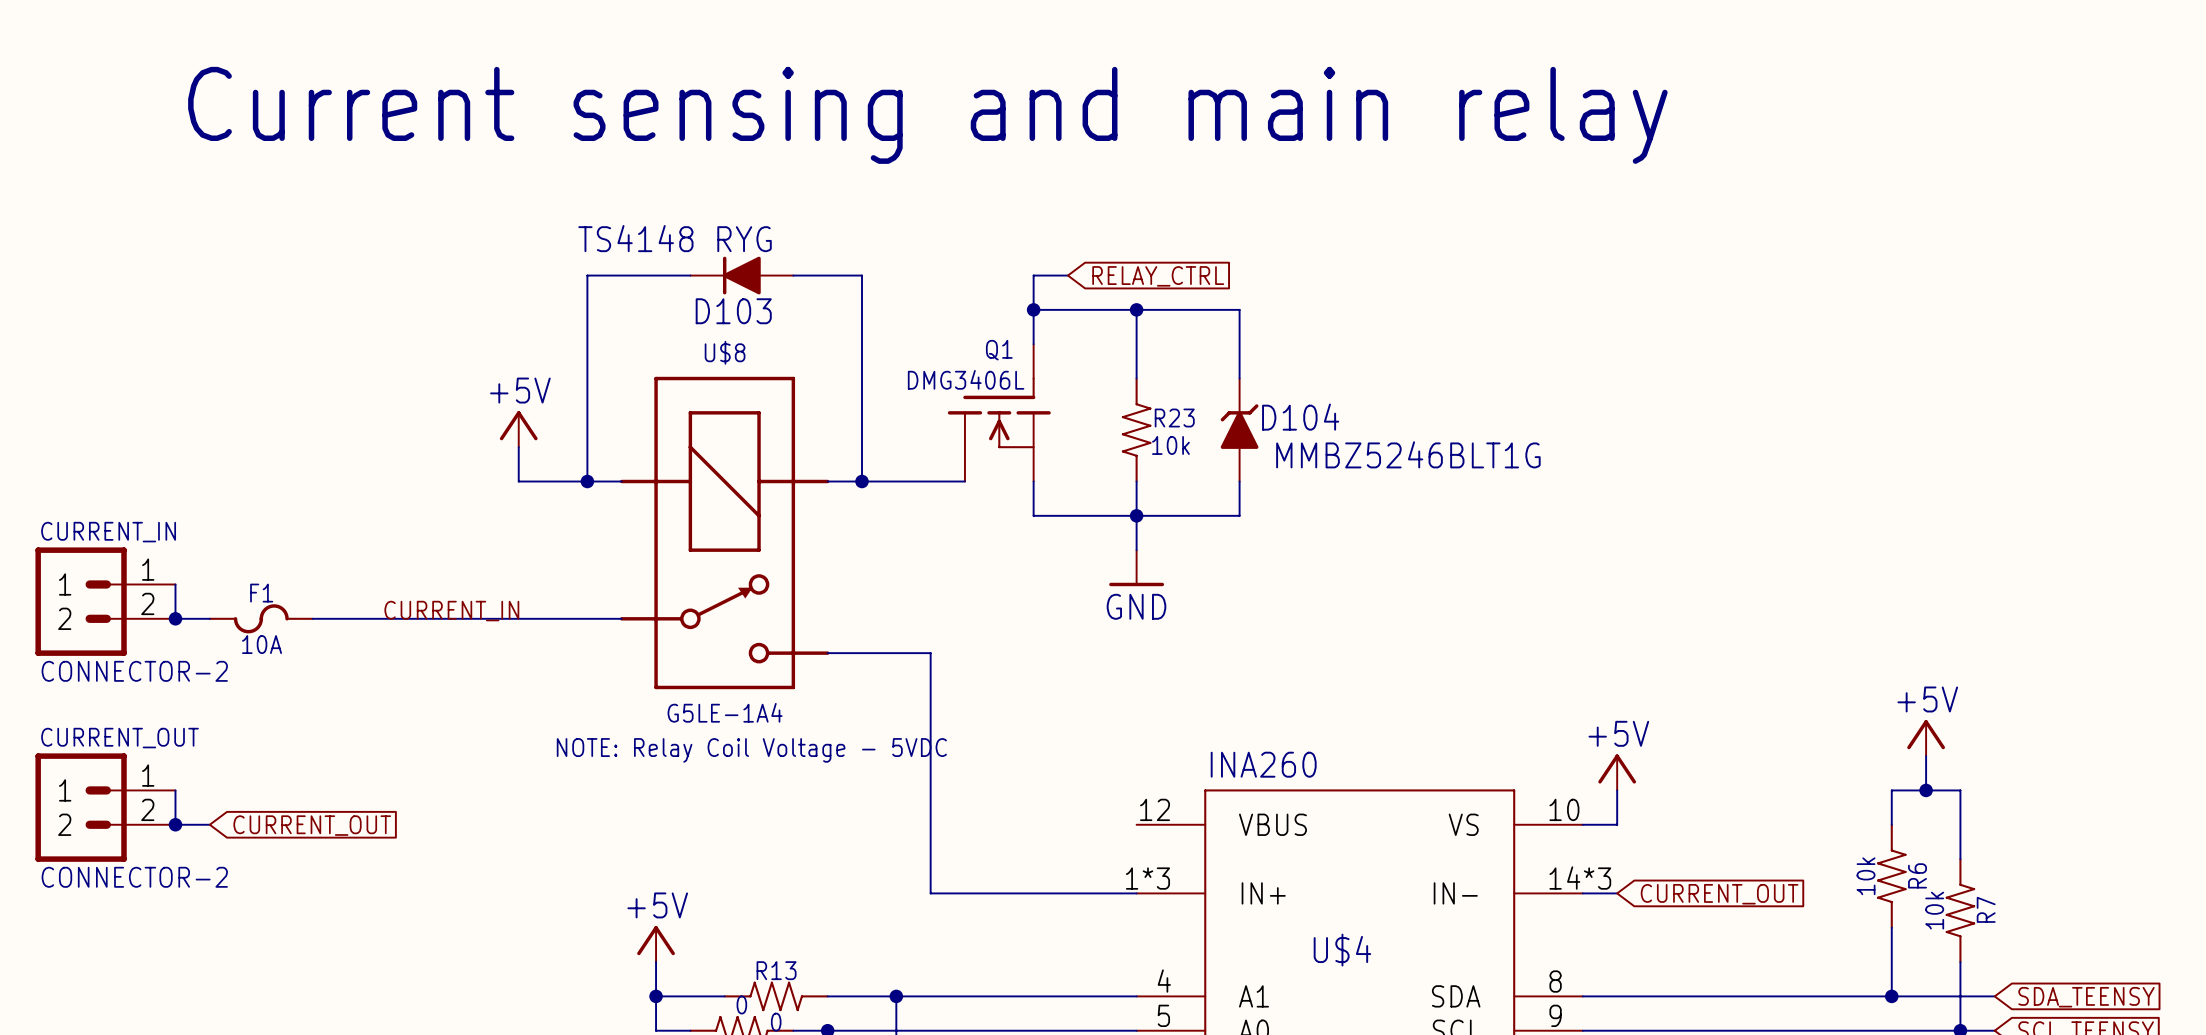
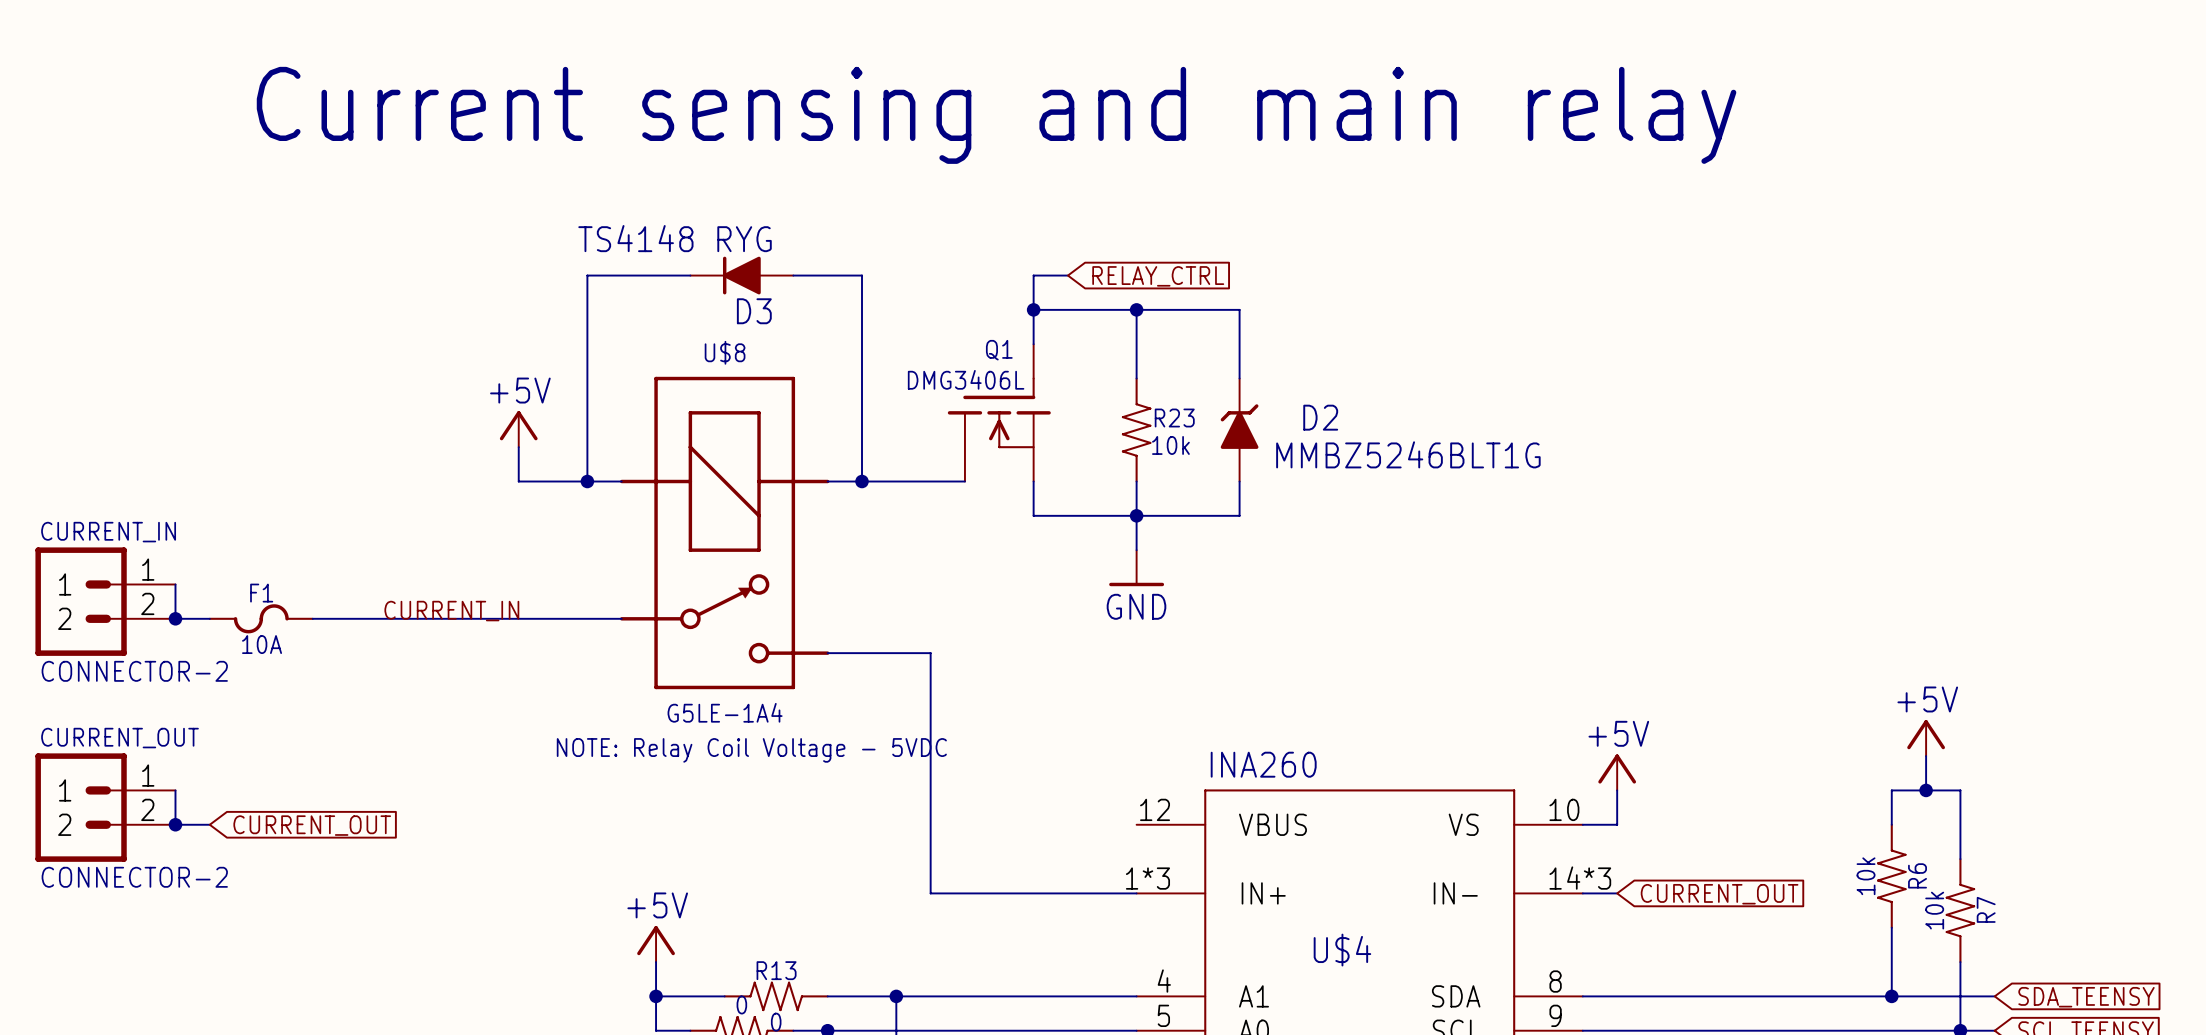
text position: Current sensing and main relay (927, 115) -> Current sensing and main relay (996, 115)
D103 name: D103 (733, 311) -> D3 (754, 311)
D104 name: D104 (1300, 417) -> D2 (1320, 417)

